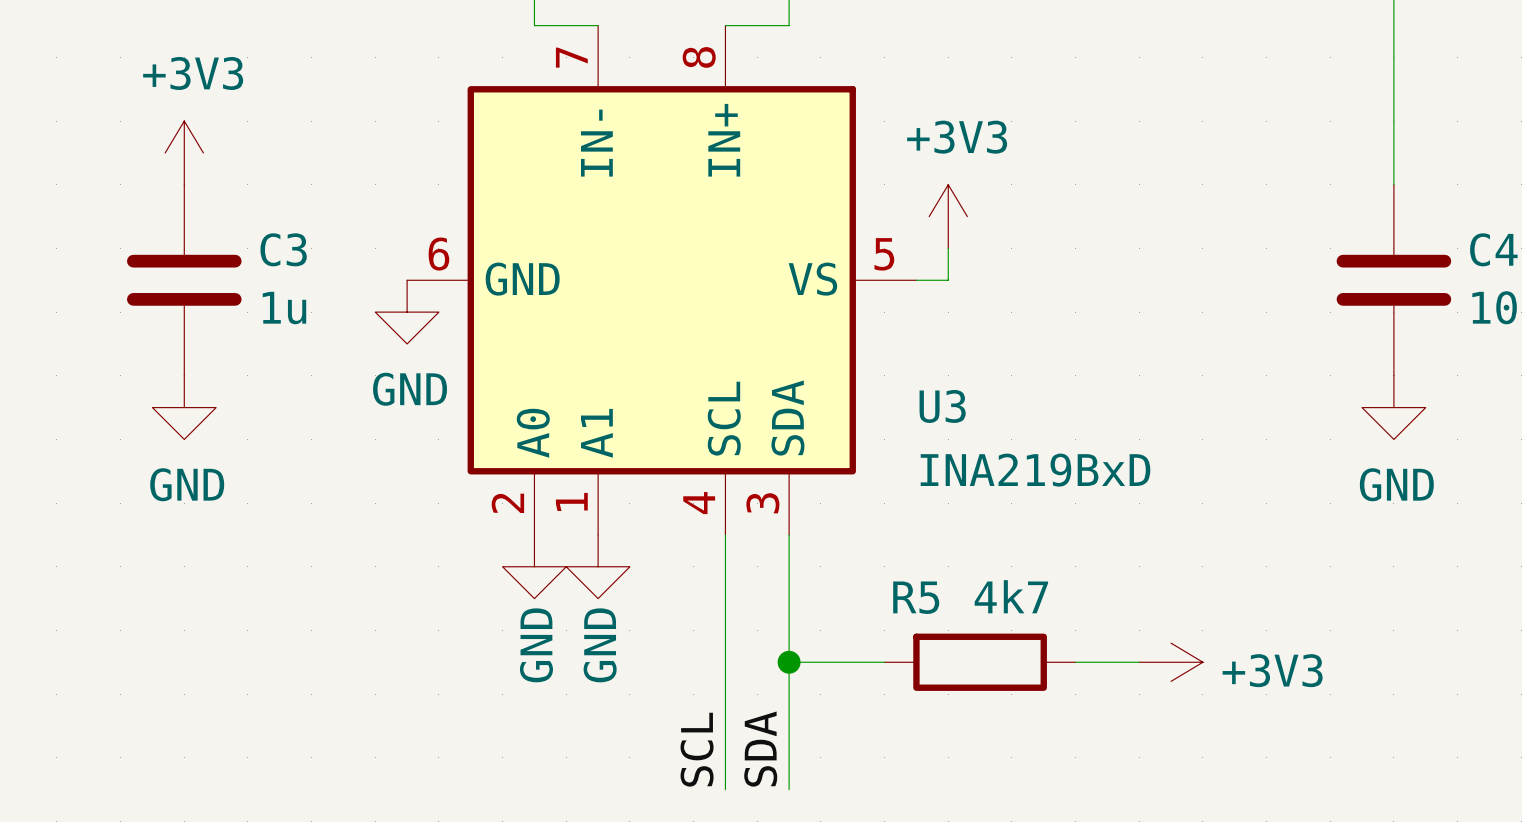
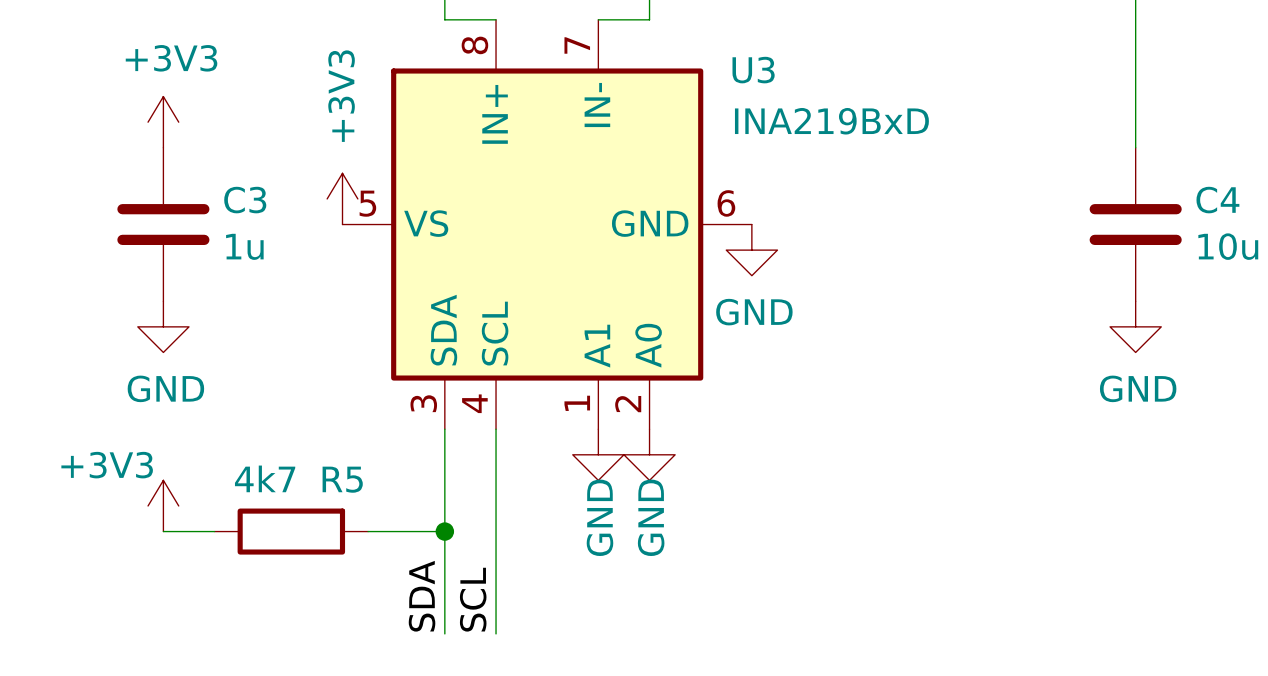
power symbol: +3V3 (948, 216) -> none
power symbol: none -> +3V3 (342, 198)
wire: (948, 248) (948, 280) (916, 280) -> none
U3 flip: as is (661, 280) -> left-right (547, 224)
power symbol: GND (407, 312) -> none
power symbol: none -> GND (751, 250)
U3 name position: U3 (942, 406) -> U3 (753, 70)
U3 value position: INA219BxD (1035, 470) -> INA219BxD (831, 121)
wire: (725, 534) (725, 789) -> (444, 429) (444, 633)
wire: (789, 534) (789, 789) -> (496, 429) (496, 633)
power symbol: GND (534, 566) -> none
power symbol: GND (598, 566) -> none
power symbol: none -> GND (598, 454)
power symbol: none -> GND (649, 454)
R5 value position: 4k7 (1011, 596) -> 4k7 (265, 478)
R5 name position: R5 (916, 597) -> R5 (342, 479)
power symbol: none -> +3V3 (163, 505)
wire: none -> (163, 531) (214, 531)
junction: none -> (444, 531)
wire: (789, 662) (884, 662) -> (368, 531) (444, 531)
junction: (789, 662) -> none
R5 position: (980, 662) -> (291, 531)
wire: (1075, 662) (1139, 662) -> none
power symbol: +3V3 (1171, 662) -> none
label position: SCL (697, 749) -> SCL (473, 599)
label position: SDA (760, 749) -> SDA (422, 596)

